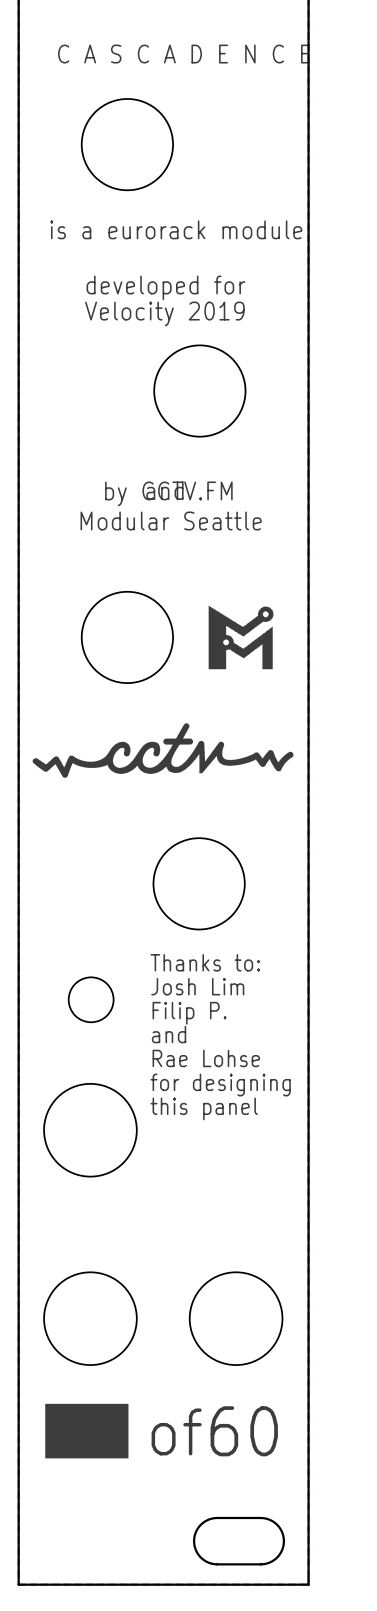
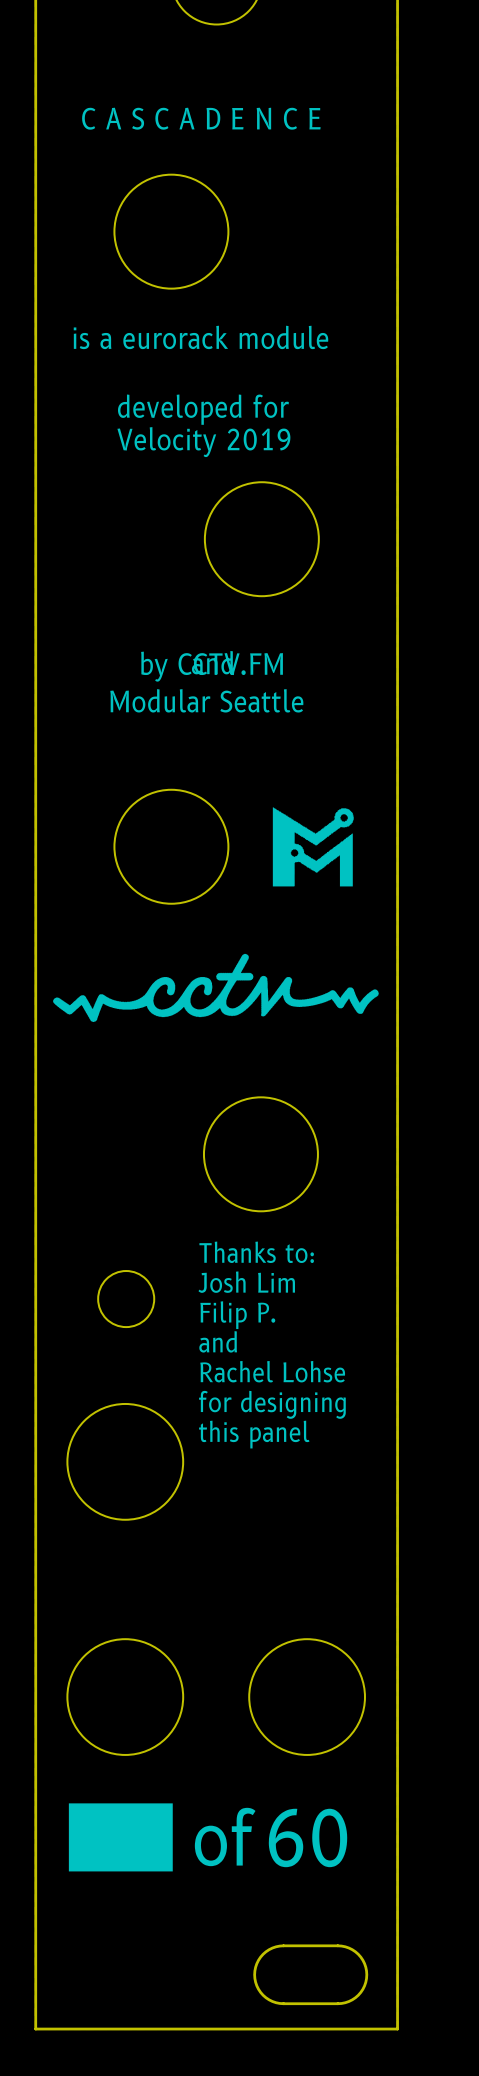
text: Rae Lohse (206, 1058) -> Rachel Lohse (272, 1371)

